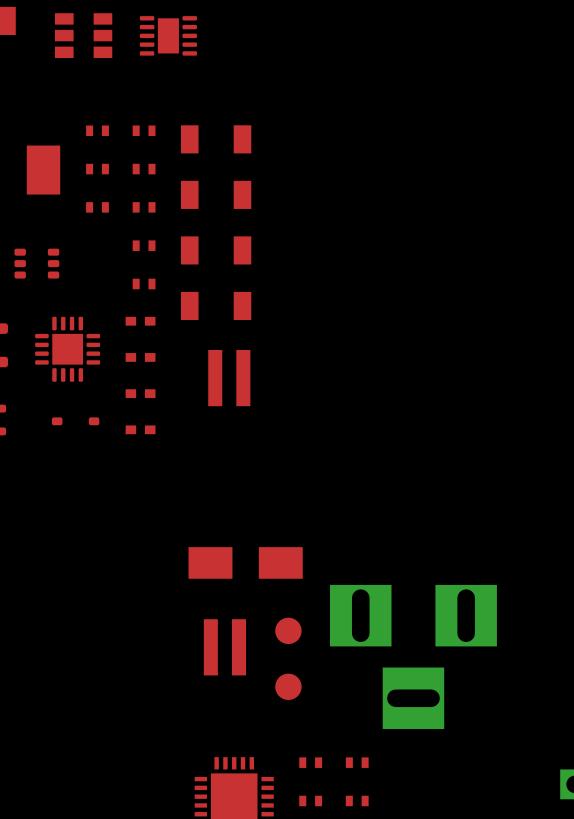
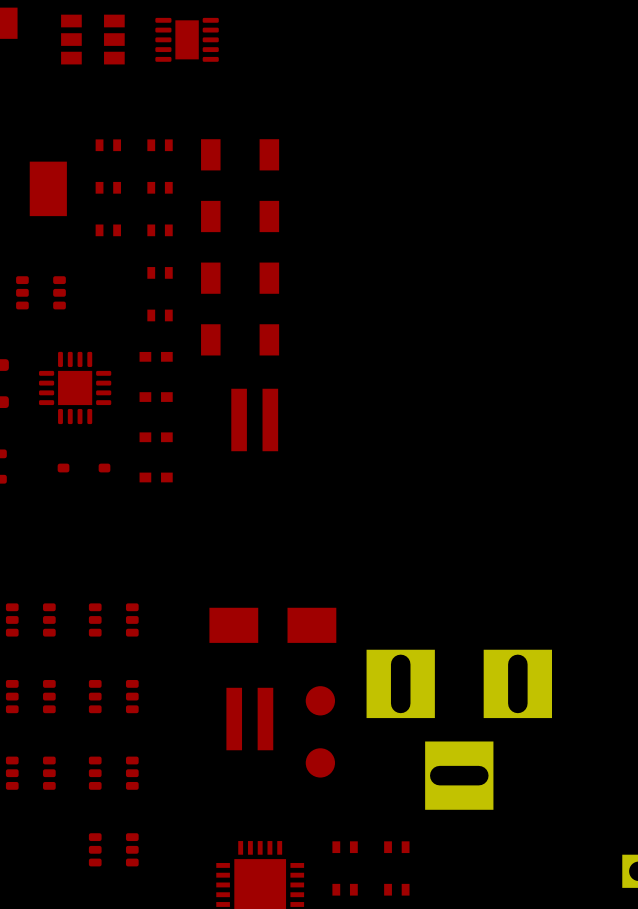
part: none -> (30, 619)
part: none -> (113, 619)
part: none -> (30, 696)
part: none -> (113, 696)
part: none -> (30, 773)
part: none -> (113, 773)
part: none -> (113, 849)

